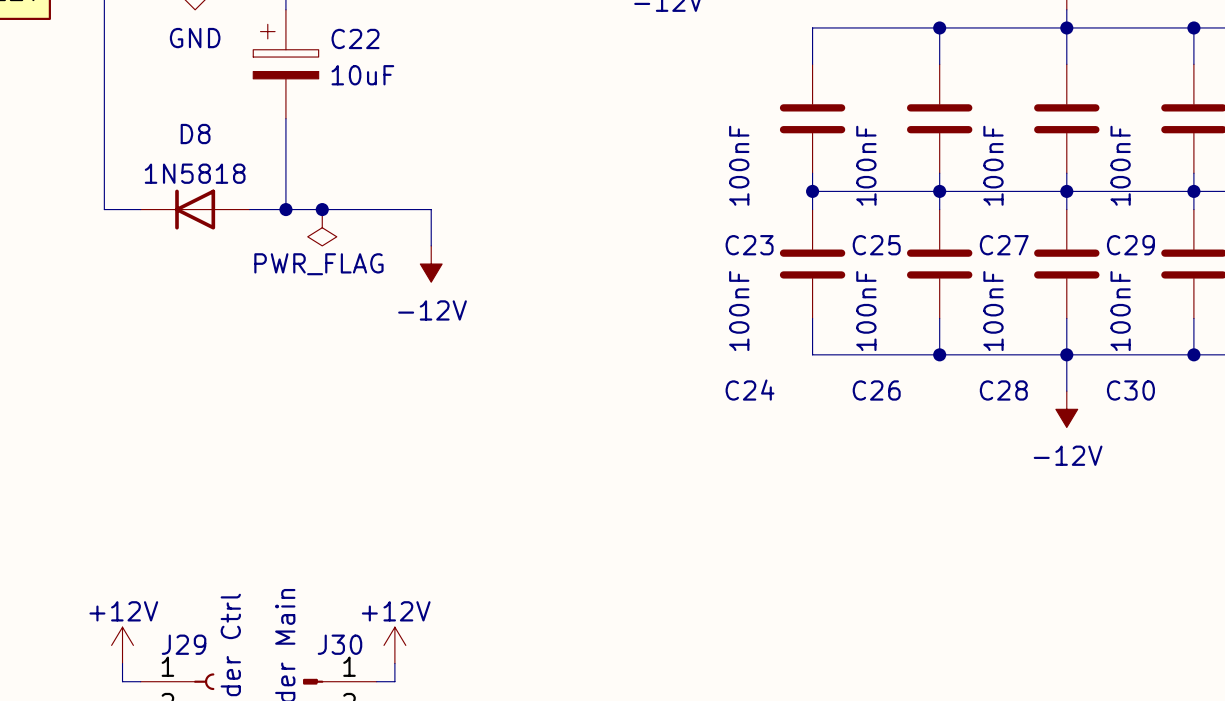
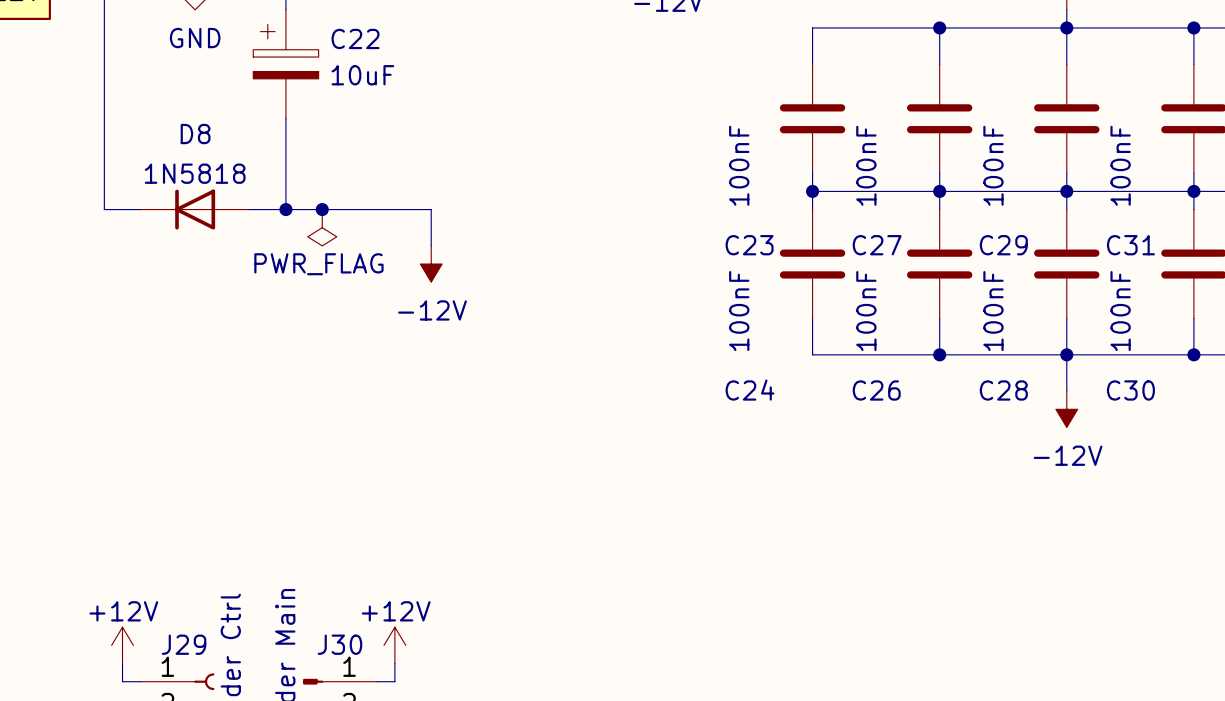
C25 name: C25 (876, 245) -> C27 (877, 245)
C27 name: C27 (1004, 245) -> C29 (1003, 245)
C29 name: C29 (1130, 245) -> C31 (1130, 245)

